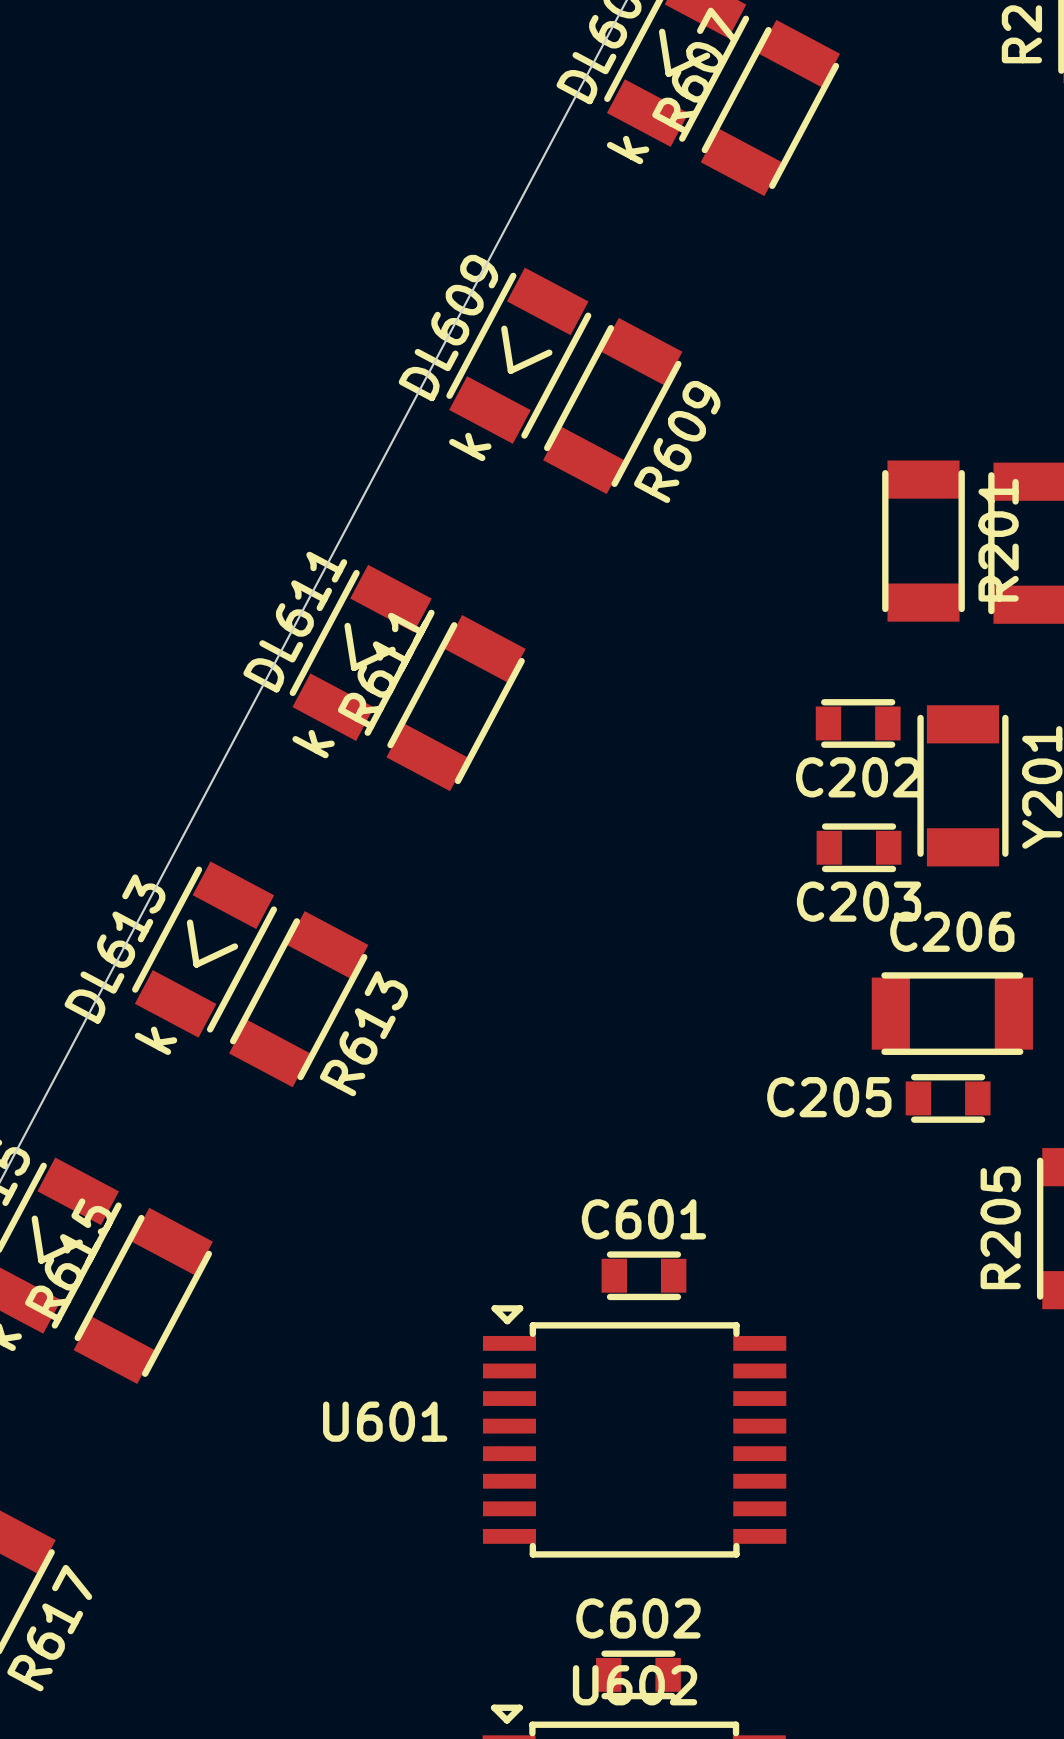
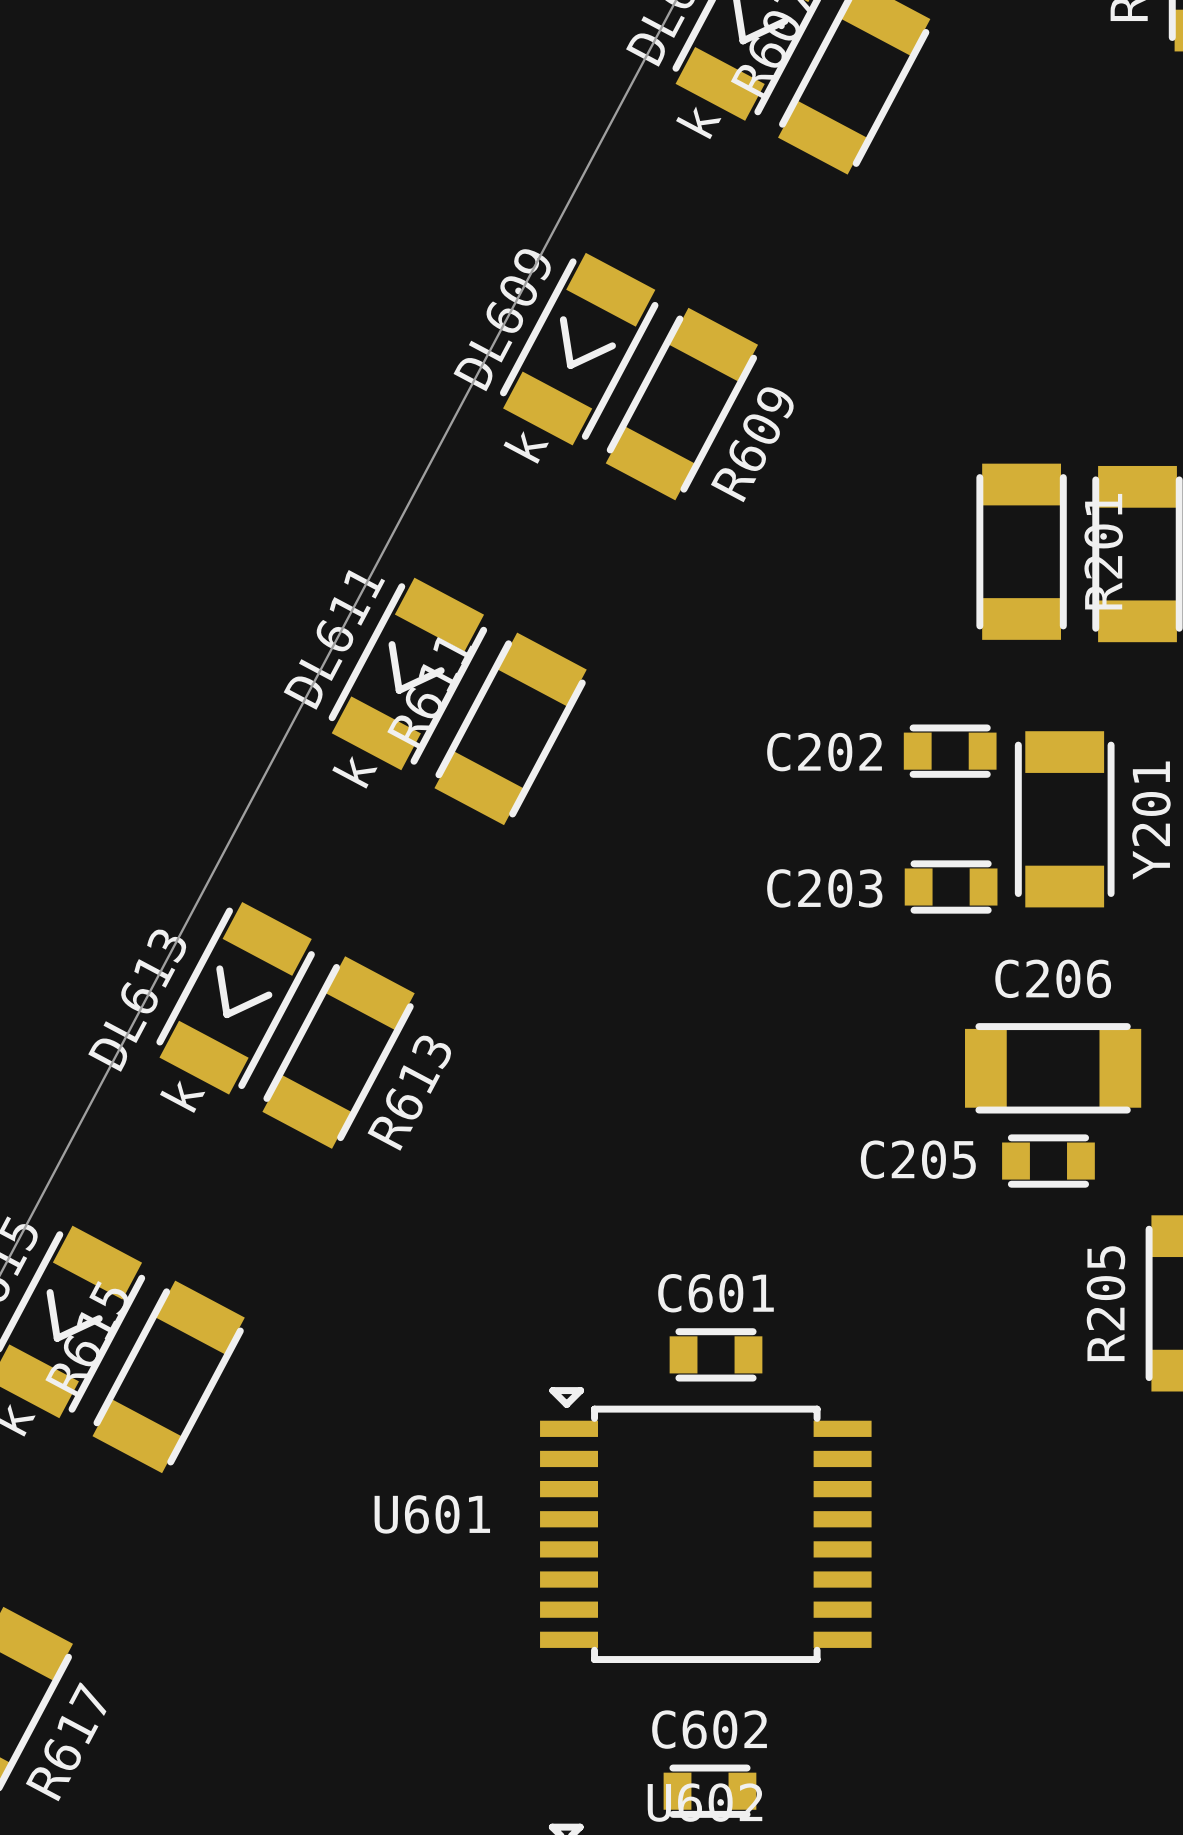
C202 name position: C202 (858, 777) -> C202 (824, 752)
C203 name position: C203 (859, 901) -> C203 (824, 888)

